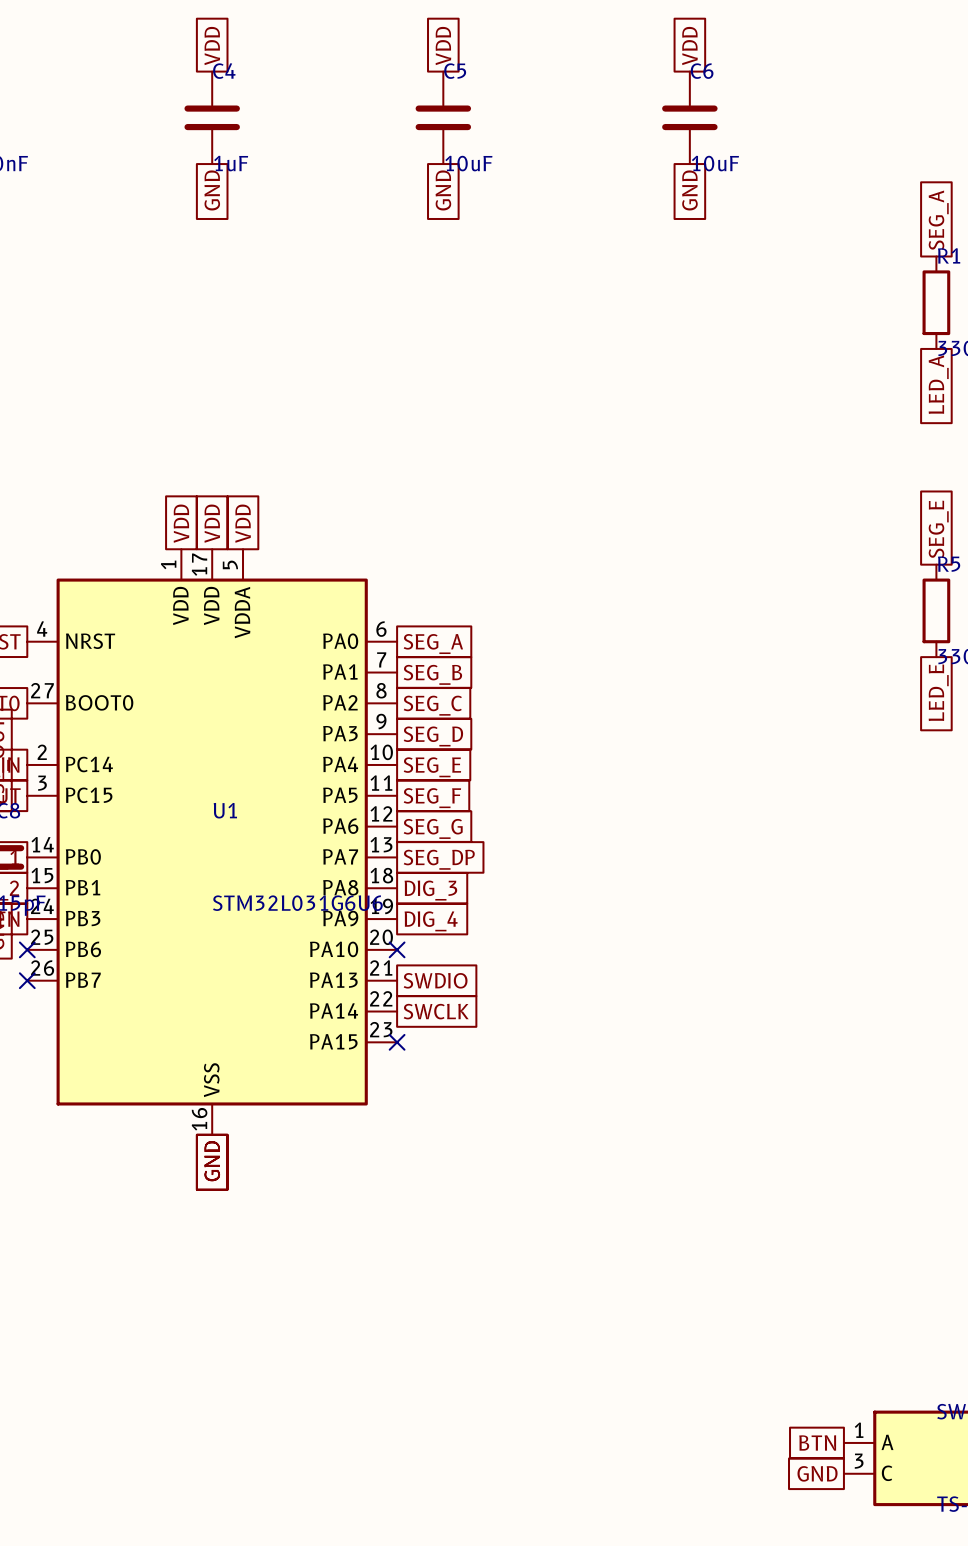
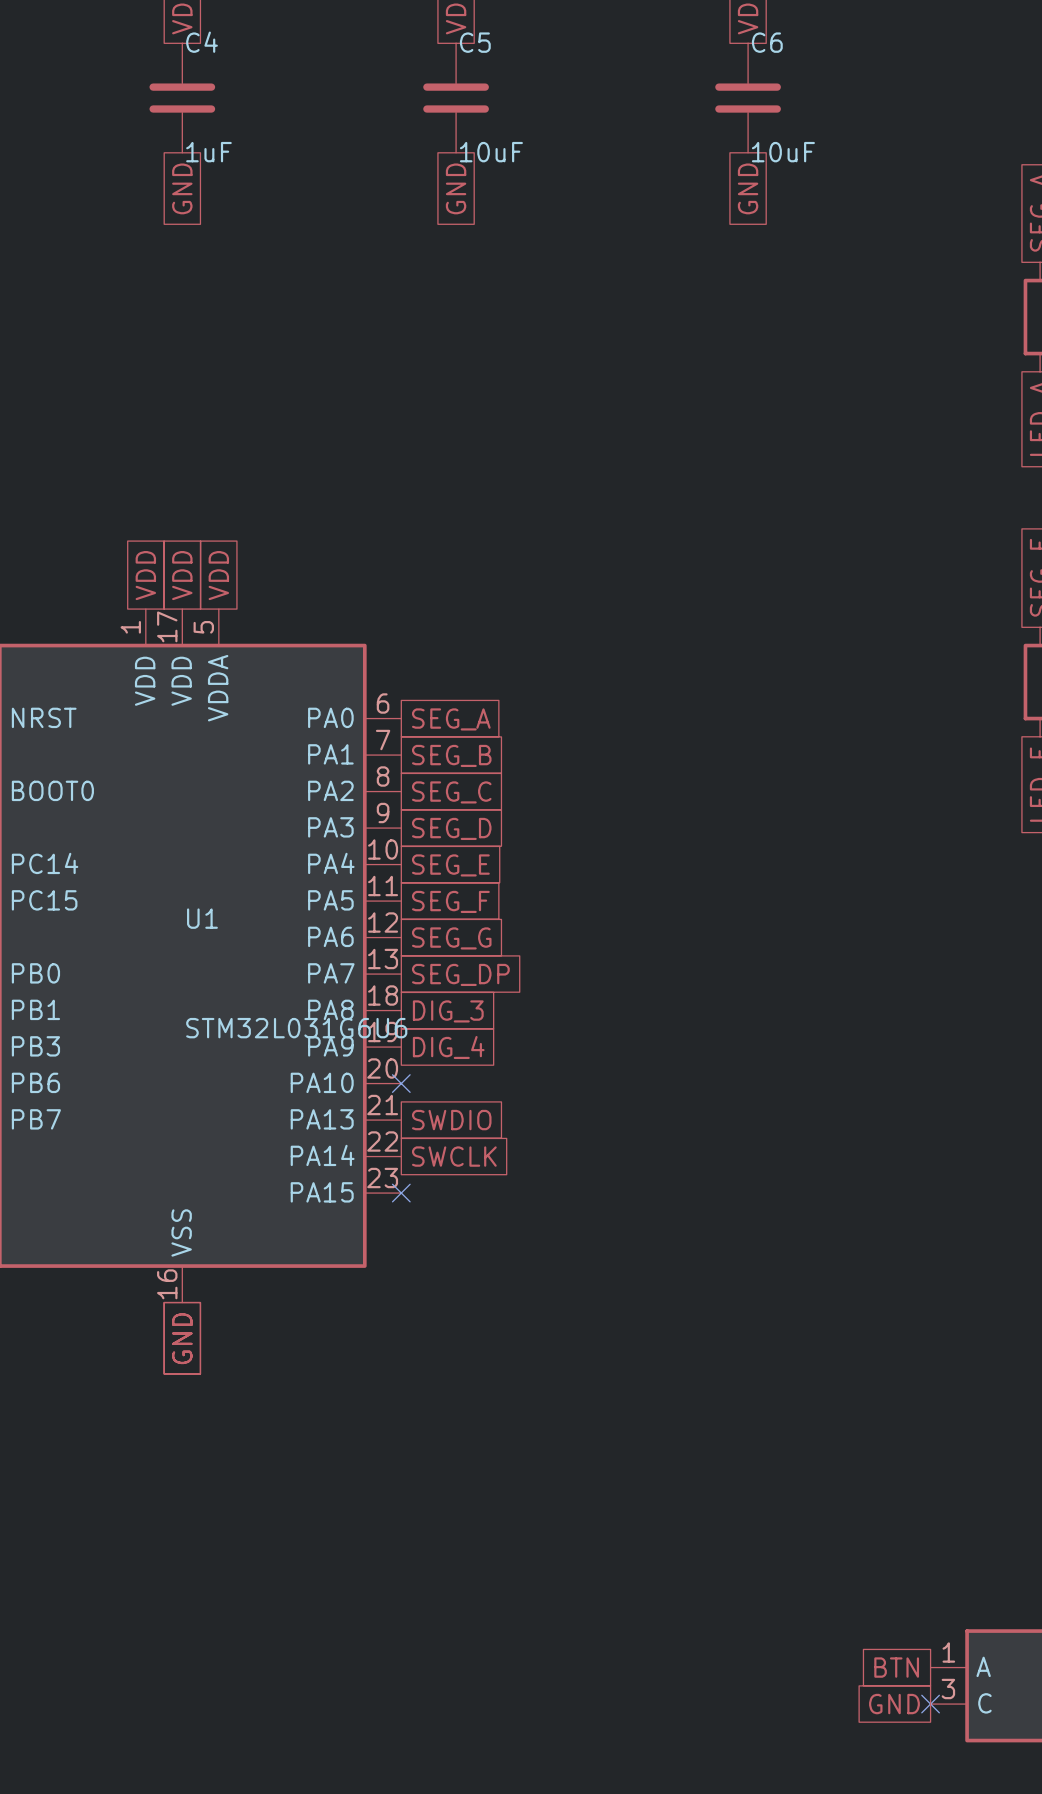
no-connect mark: none -> (930, 1704)

